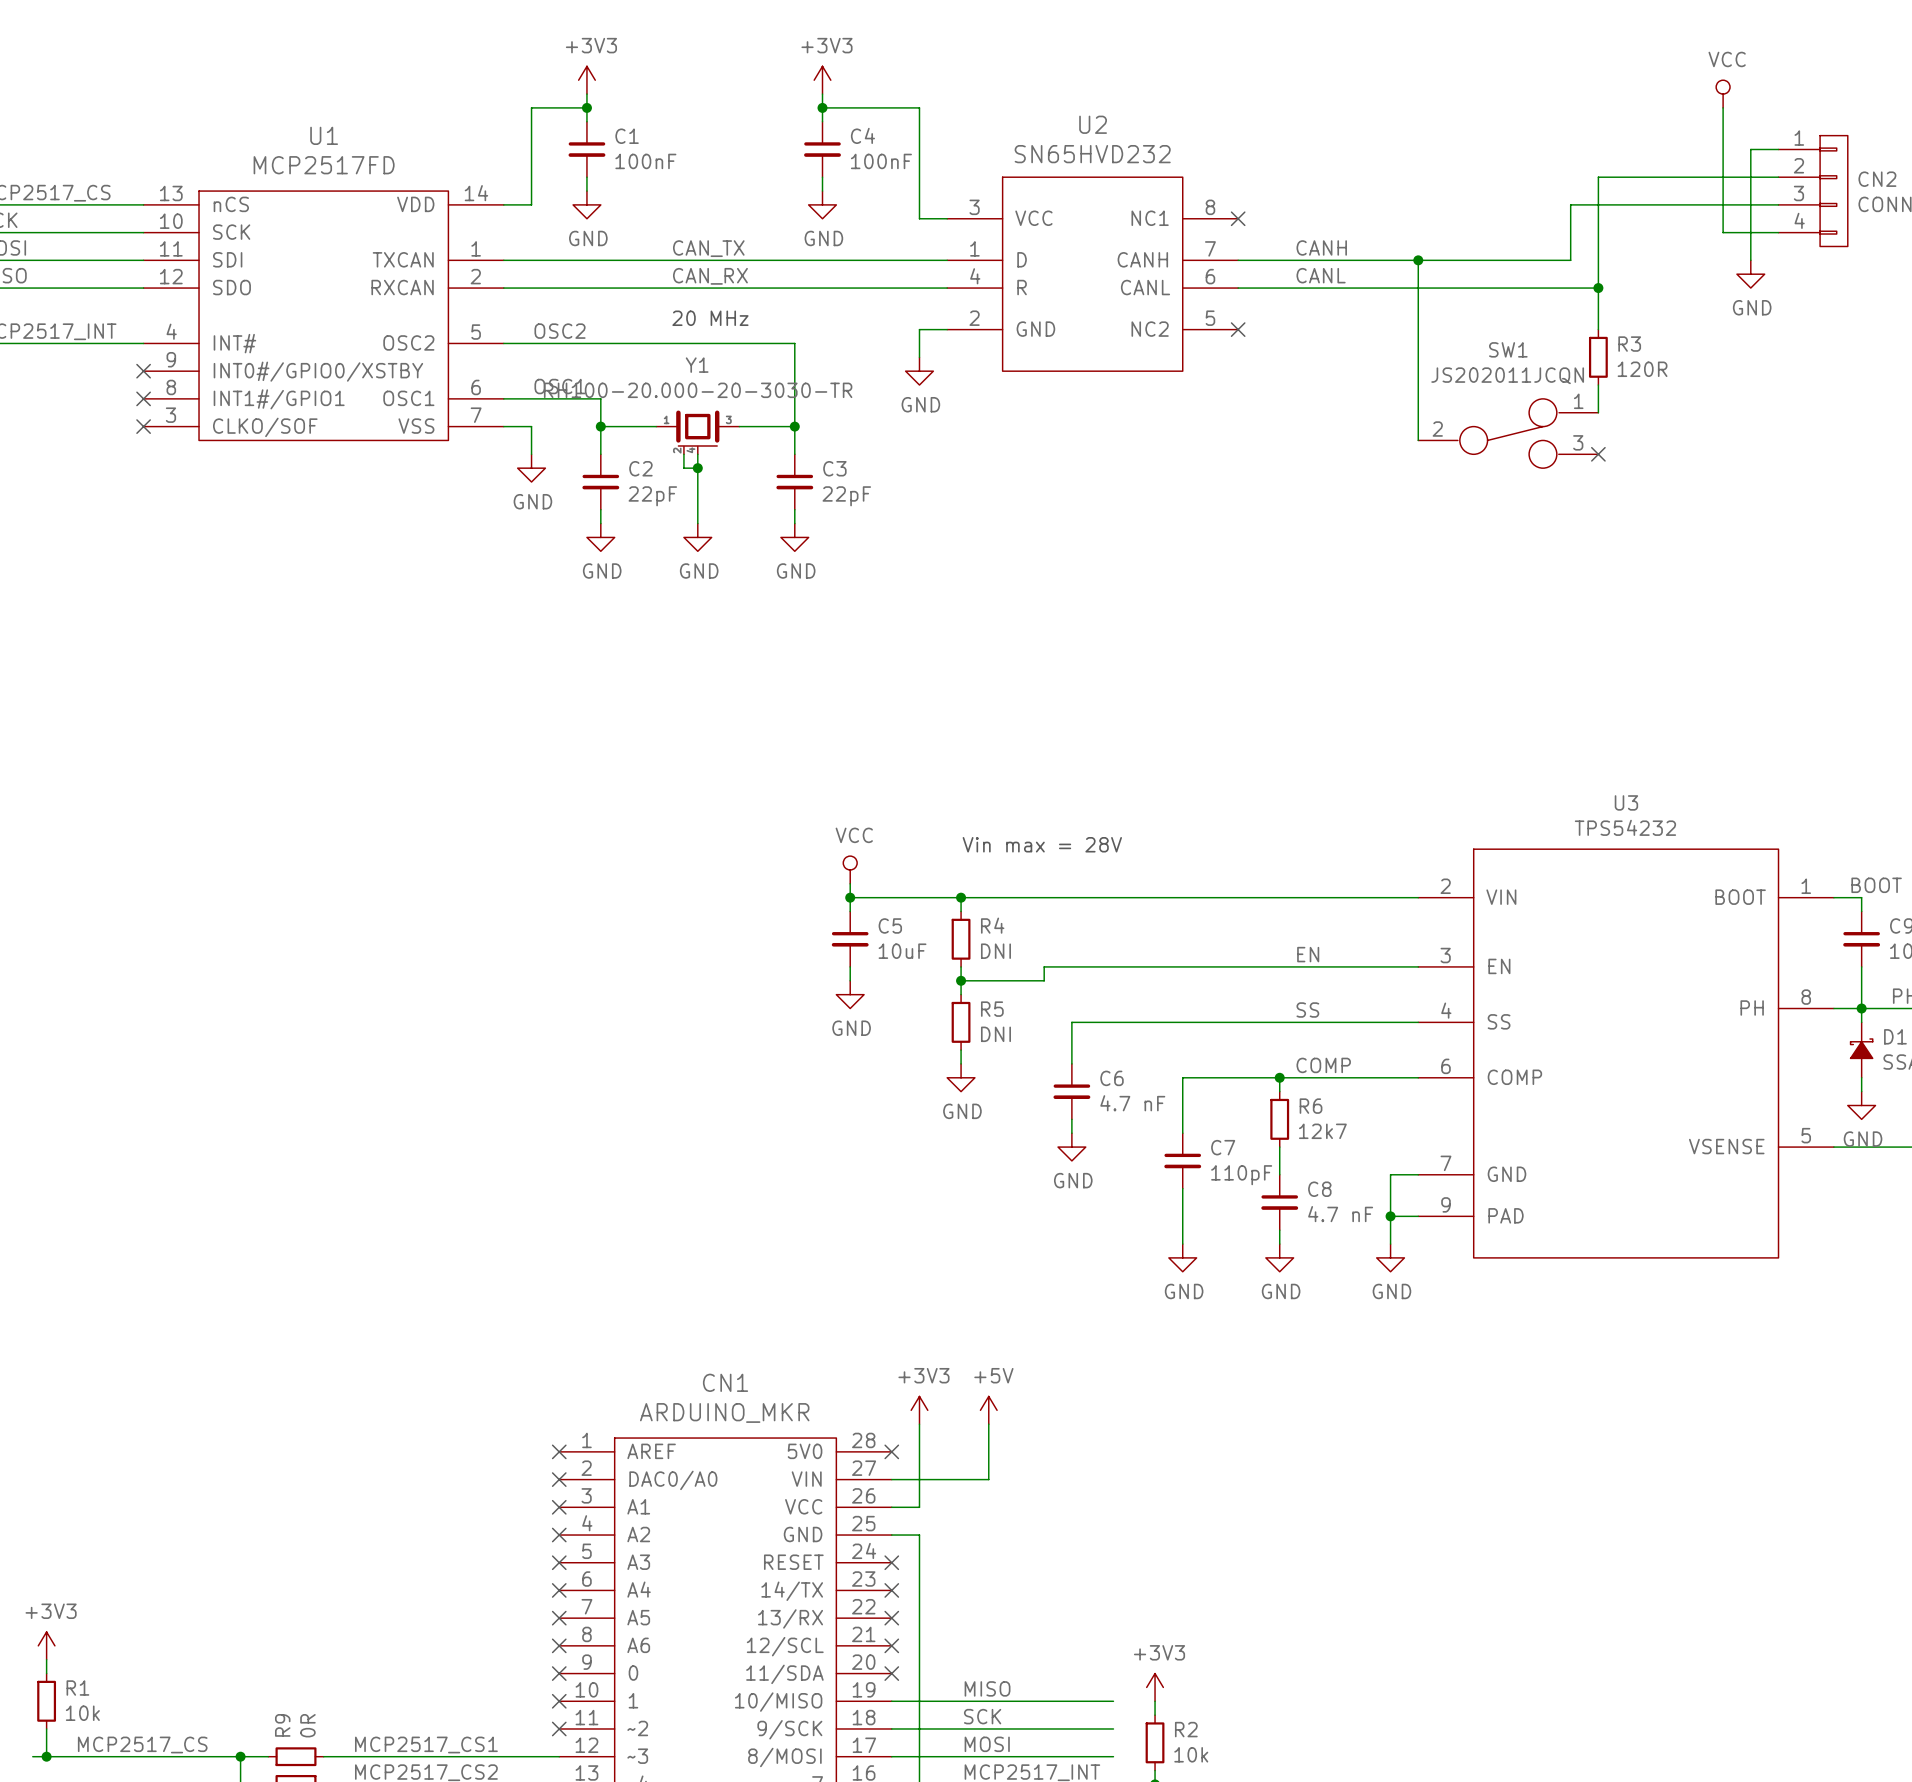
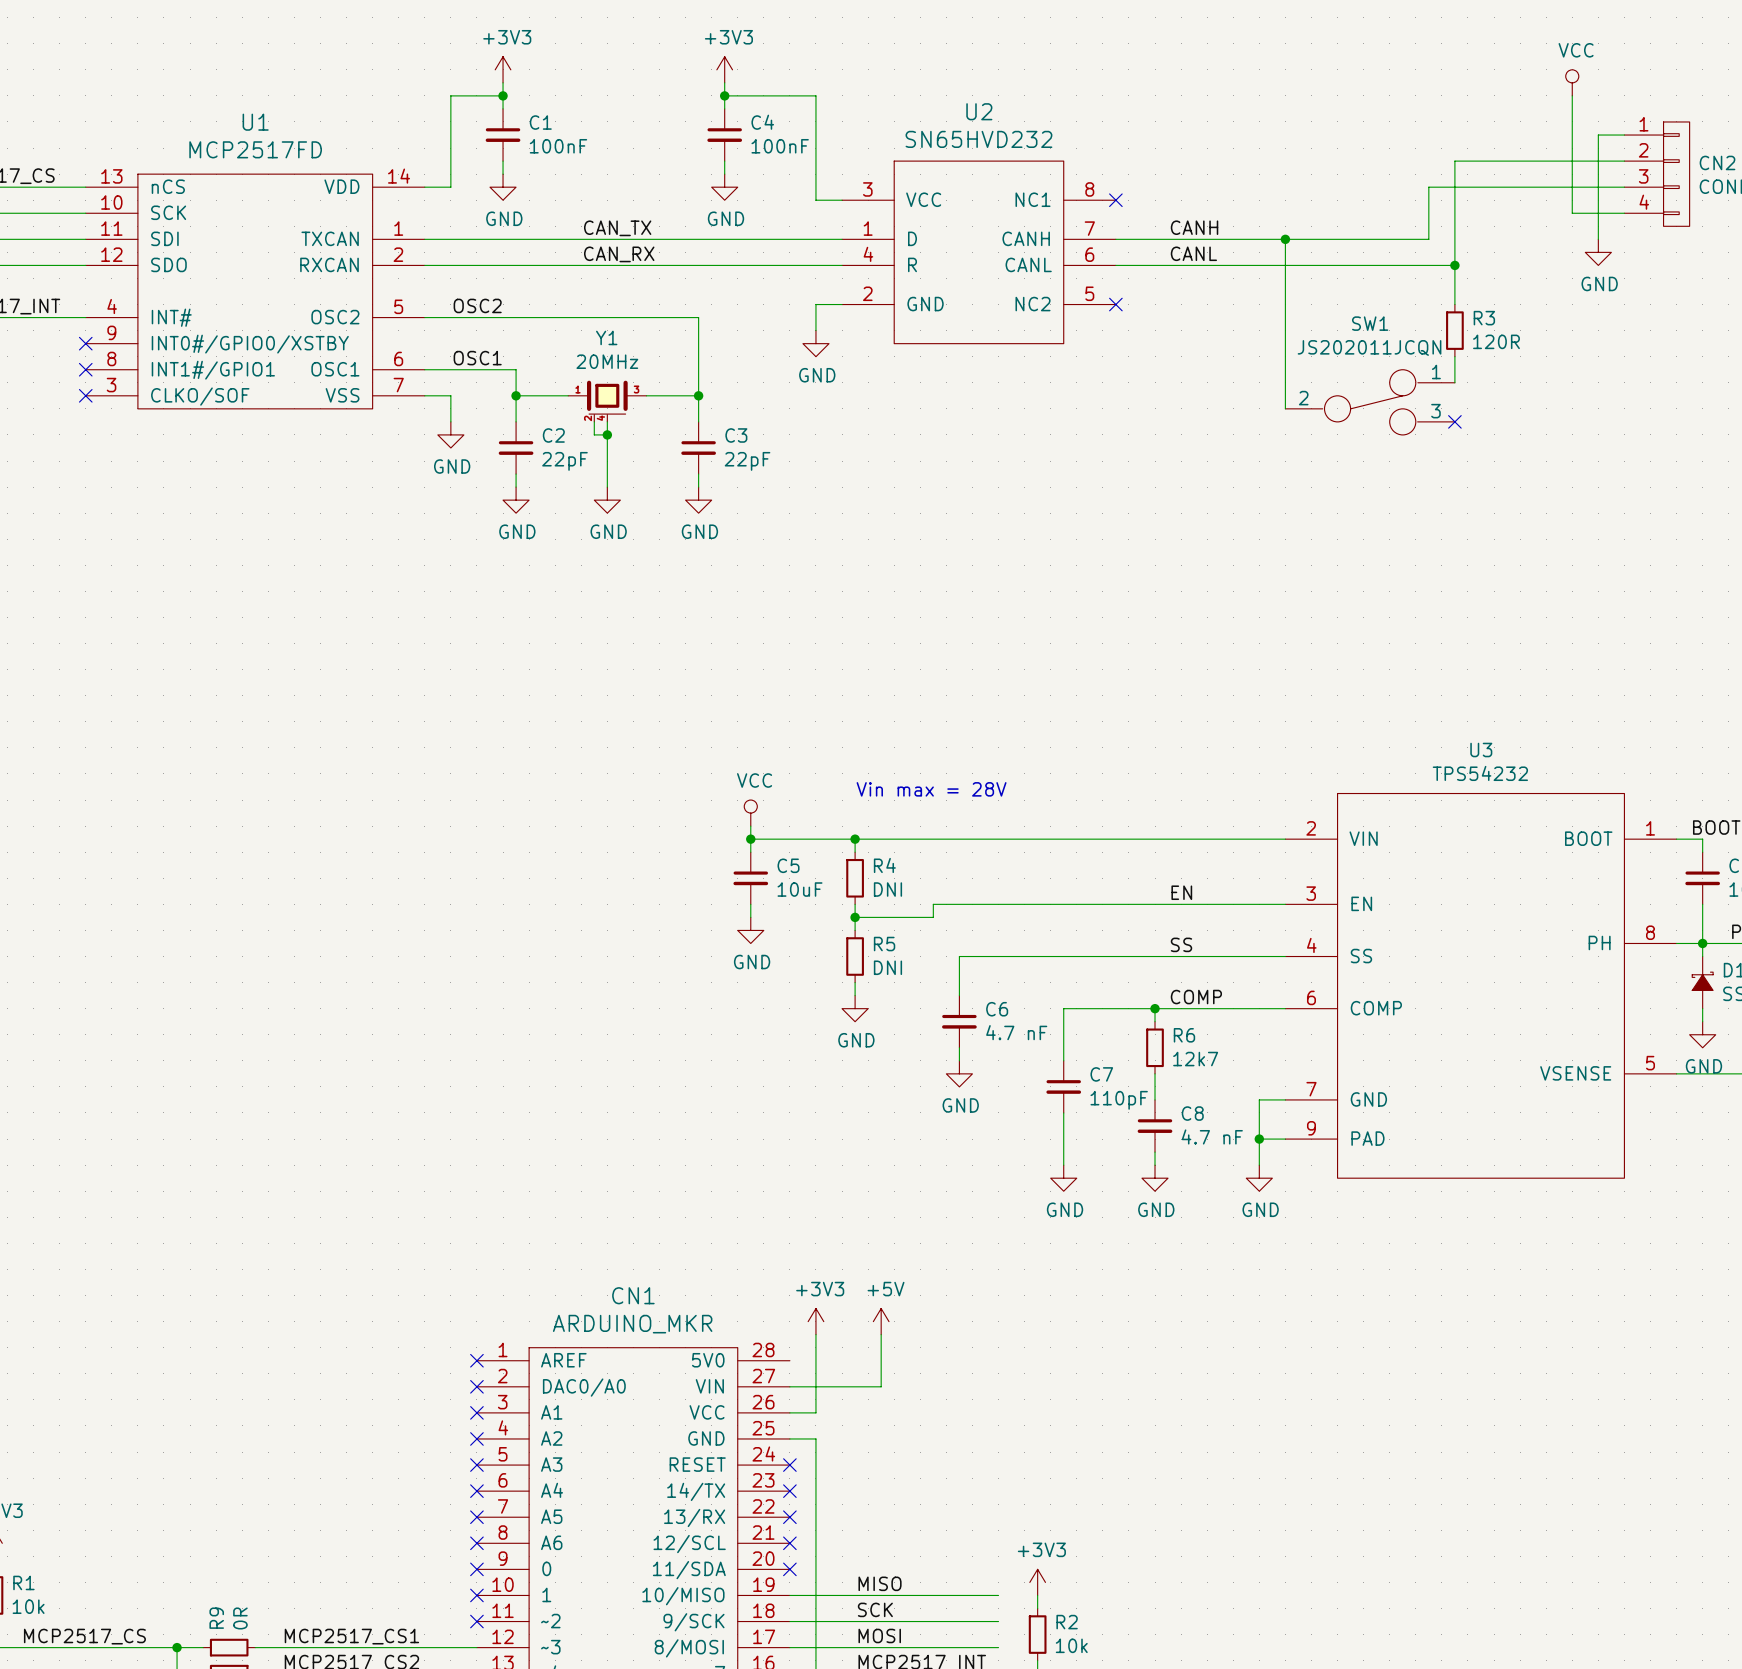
text: 20 MHz (710, 318) -> none
Y1 value: RH100-20.000-20-3030-TR (698, 390) -> 20MHz (607, 361)
no-connect mark: (891, 1451) -> none

